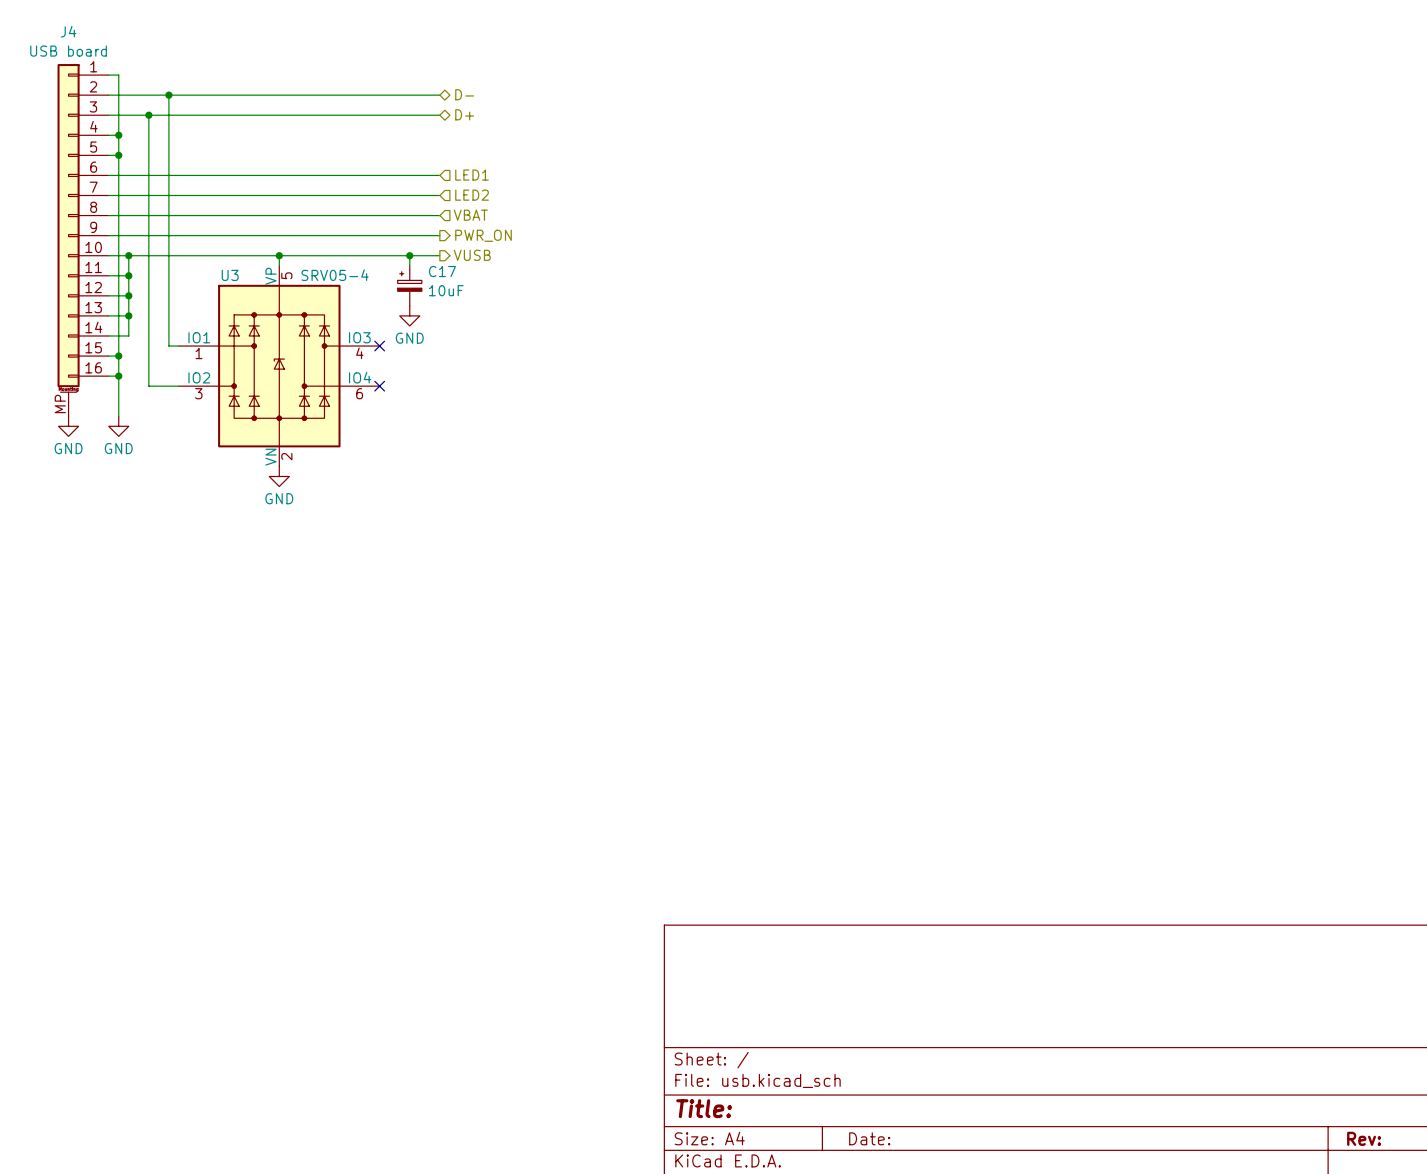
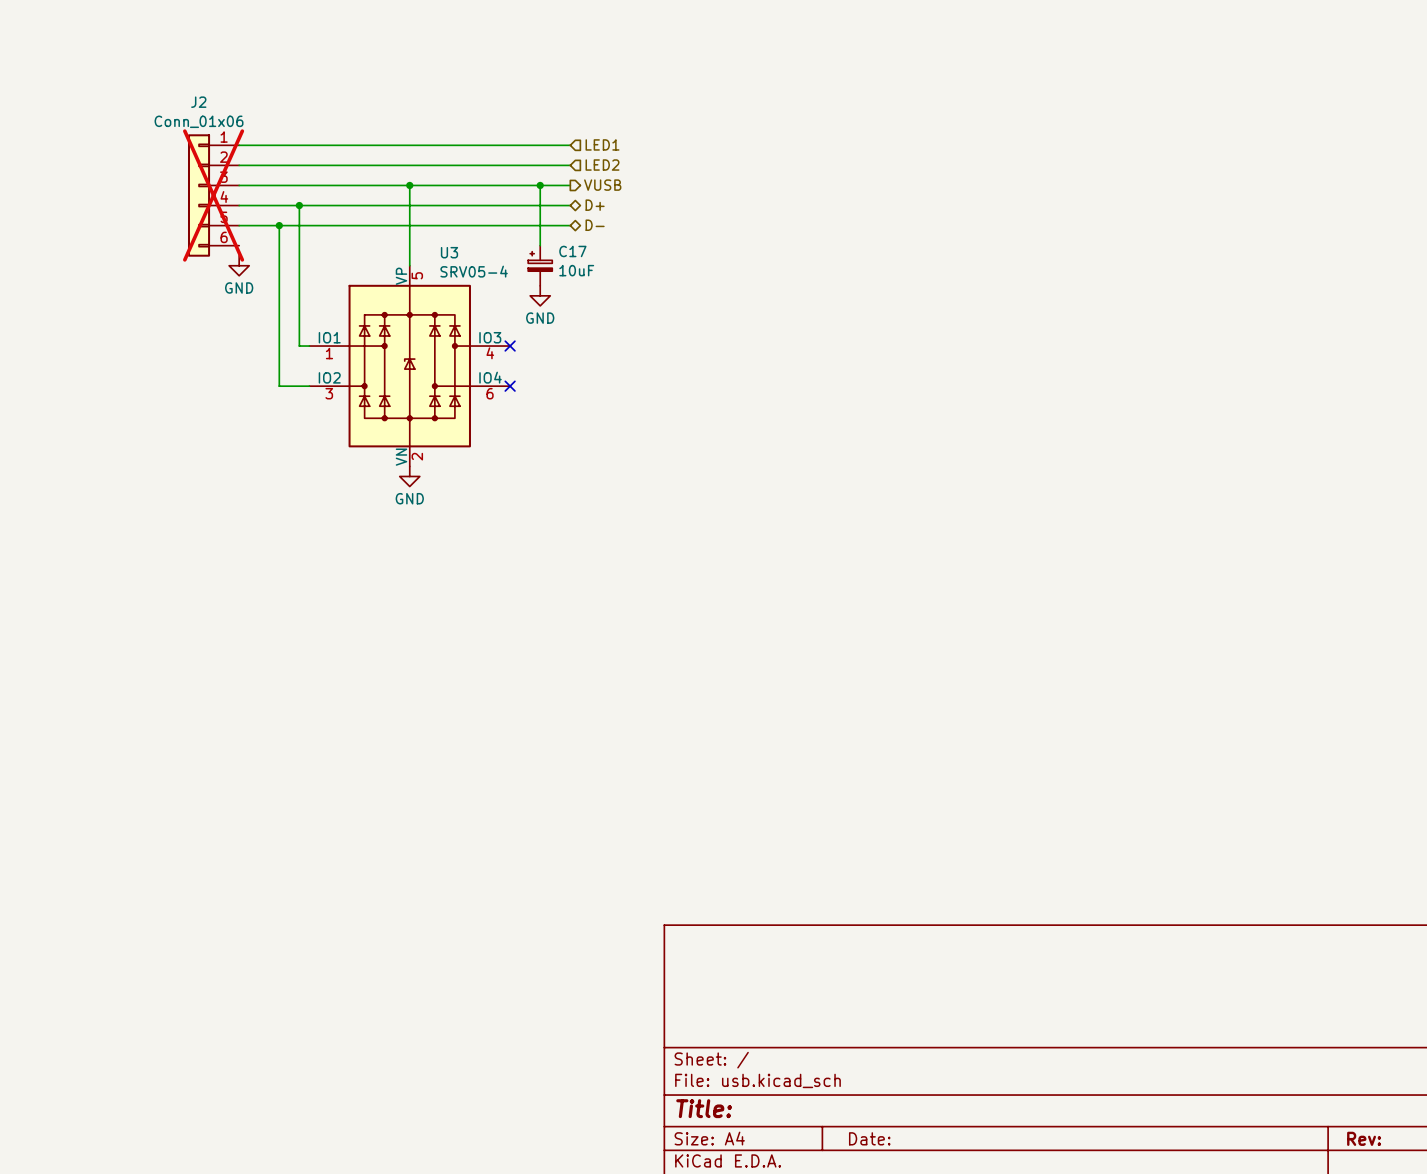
wire: (108, 75) (118, 75) (118, 416) -> none
hierarchical label position: D- (464, 94) -> D- (595, 225)
wire: (108, 95) (439, 95) -> none
wire: (168, 95) (168, 346) (178, 346) -> none
junction: (168, 95) -> none
hierarchical label position: D+ (464, 114) -> D+ (595, 205)
wire: (108, 115) (439, 115) -> none
wire: (148, 115) (148, 386) (178, 386) -> none
junction: (148, 115) -> none
wire: (108, 135) (118, 135) -> none
junction: (118, 135) -> none
wire: (108, 155) (118, 155) -> none
junction: (118, 155) -> none
wire: (108, 175) (439, 175) -> (239, 145) (570, 145)
hierarchical label position: LED1 (472, 175) -> LED1 (602, 144)
wire: none -> (409, 185) (409, 255)
junction: none -> (409, 185)
wire: none -> (540, 185) (540, 245)
junction: none -> (540, 185)
wire: (108, 195) (439, 195) -> (239, 165) (570, 165)
J2: none -> Conn_01x06 (213, 195)
hierarchical label position: LED2 (472, 195) -> LED2 (602, 165)
wire: none -> (299, 205) (299, 346) (309, 346)
junction: none -> (299, 205)
wire: (108, 215) (439, 215) -> (239, 185) (570, 185)
hierarchical label: VBAT (470, 215) -> none
wire: none -> (279, 225) (279, 255)
junction: none -> (279, 225)
wire: (108, 235) (439, 235) -> (239, 205) (570, 205)
hierarchical label: PWR_ON (483, 235) -> none
J4: USB board (83, 240) -> none
wire: (108, 255) (439, 255) -> (239, 225) (570, 225)
wire: (128, 255) (128, 335) (108, 335) -> none
junction: (128, 255) -> none
junction: (279, 255) -> none
junction: (409, 255) -> none
hierarchical label position: VUSB (472, 255) -> VUSB (602, 185)
power symbol: none -> GND (239, 265)
wire: (108, 275) (128, 275) -> none
junction: (128, 275) -> none
U3 name position: U3 (230, 275) -> U3 (449, 252)
U3 value position: SRV05-4 (335, 275) -> SRV05-4 (474, 271)
C17 position: (409, 285) -> (540, 265)
wire: (108, 295) (128, 295) -> none
junction: (128, 295) -> none
power symbol: none -> GND (540, 295)
wire: (108, 315) (128, 315) -> none
junction: (128, 315) -> none
power symbol: GND (409, 315) -> none
no-connect mark: (379, 346) -> none
no-connect mark: none -> (510, 346)
wire: (108, 356) (118, 356) -> none
junction: (118, 356) -> none
U3 position: (279, 366) -> (409, 366)
wire: (108, 376) (118, 376) -> none
junction: (118, 376) -> none
no-connect mark: (379, 386) -> none
no-connect mark: none -> (510, 386)
power symbol: GND (68, 426) -> none
power symbol: GND (118, 426) -> none
power symbol: GND (279, 476) -> none
power symbol: none -> GND (409, 476)

